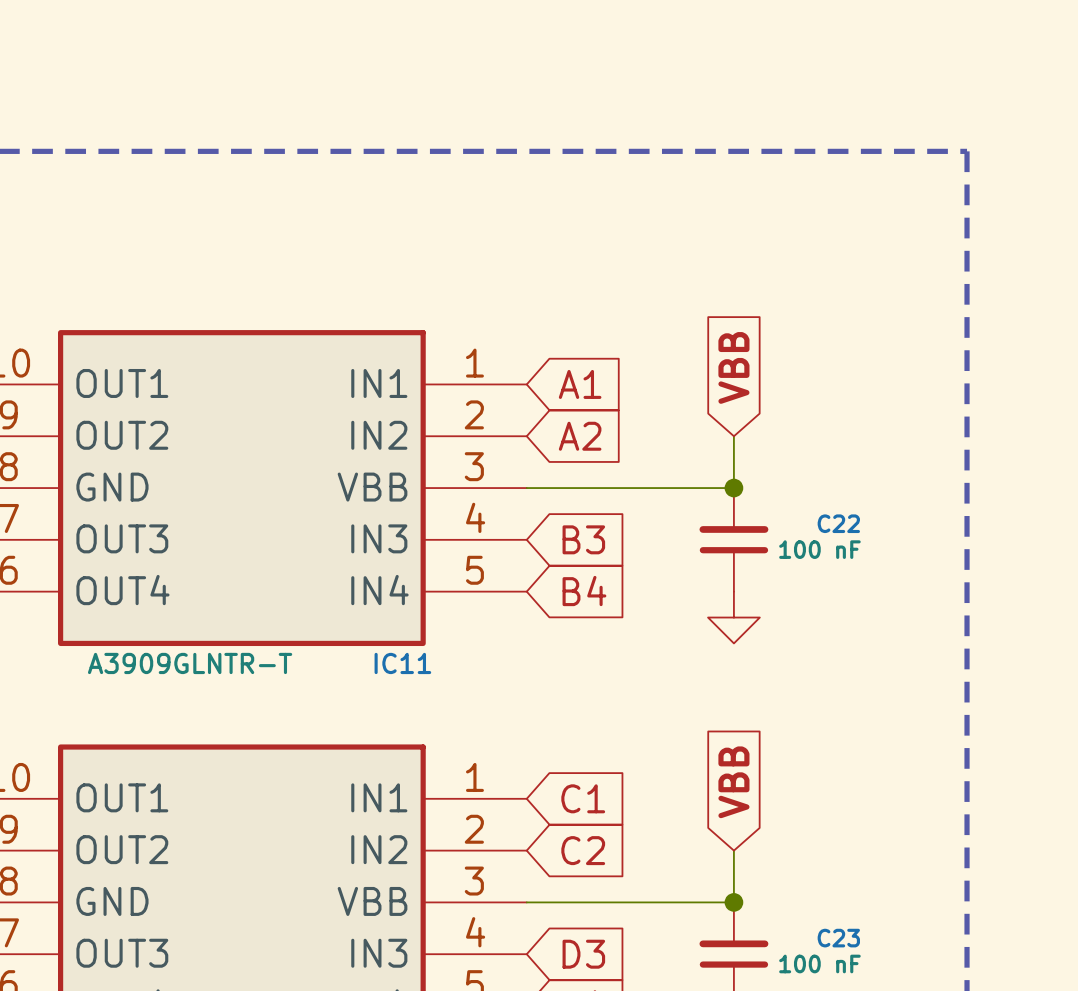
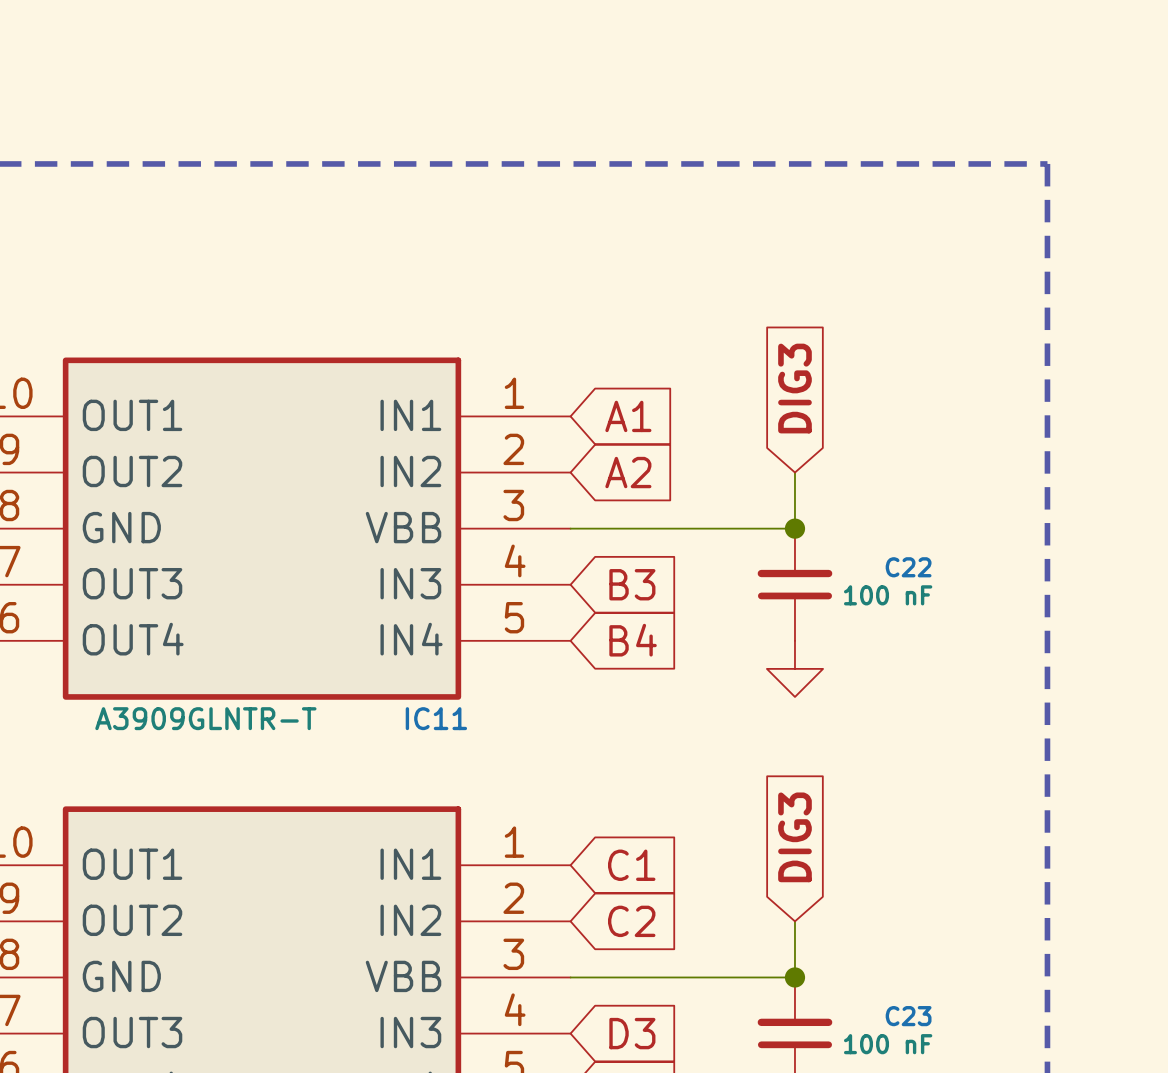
global label: VBB (733, 367) -> DIG3 (794, 388)
global label: VBB (733, 782) -> DIG3 (794, 837)

